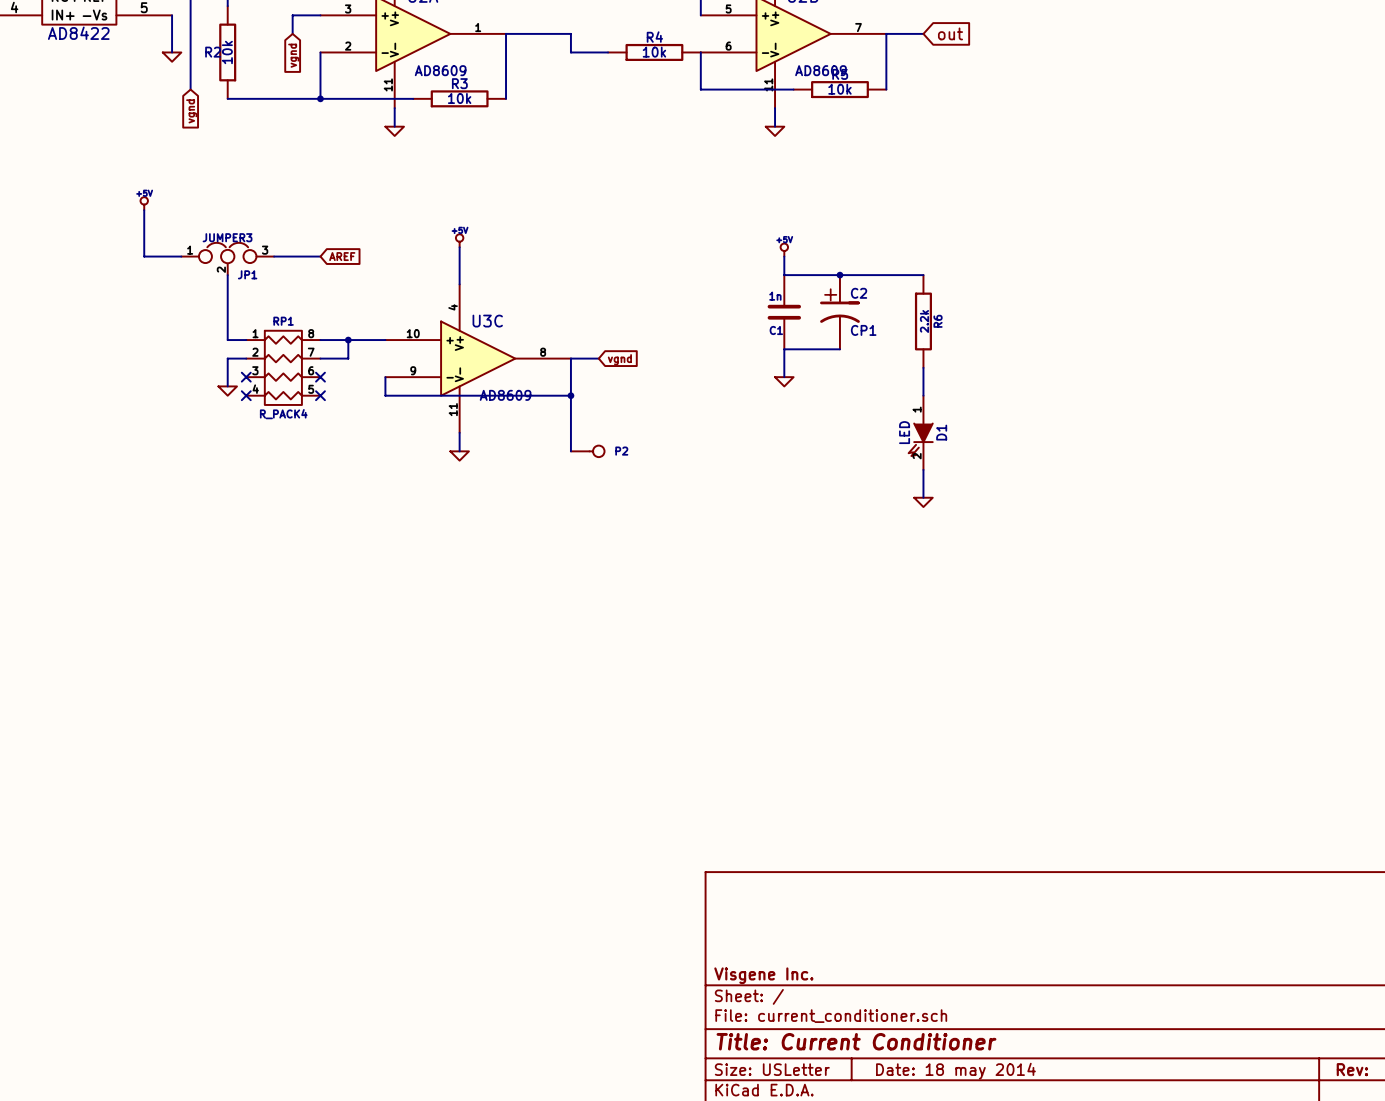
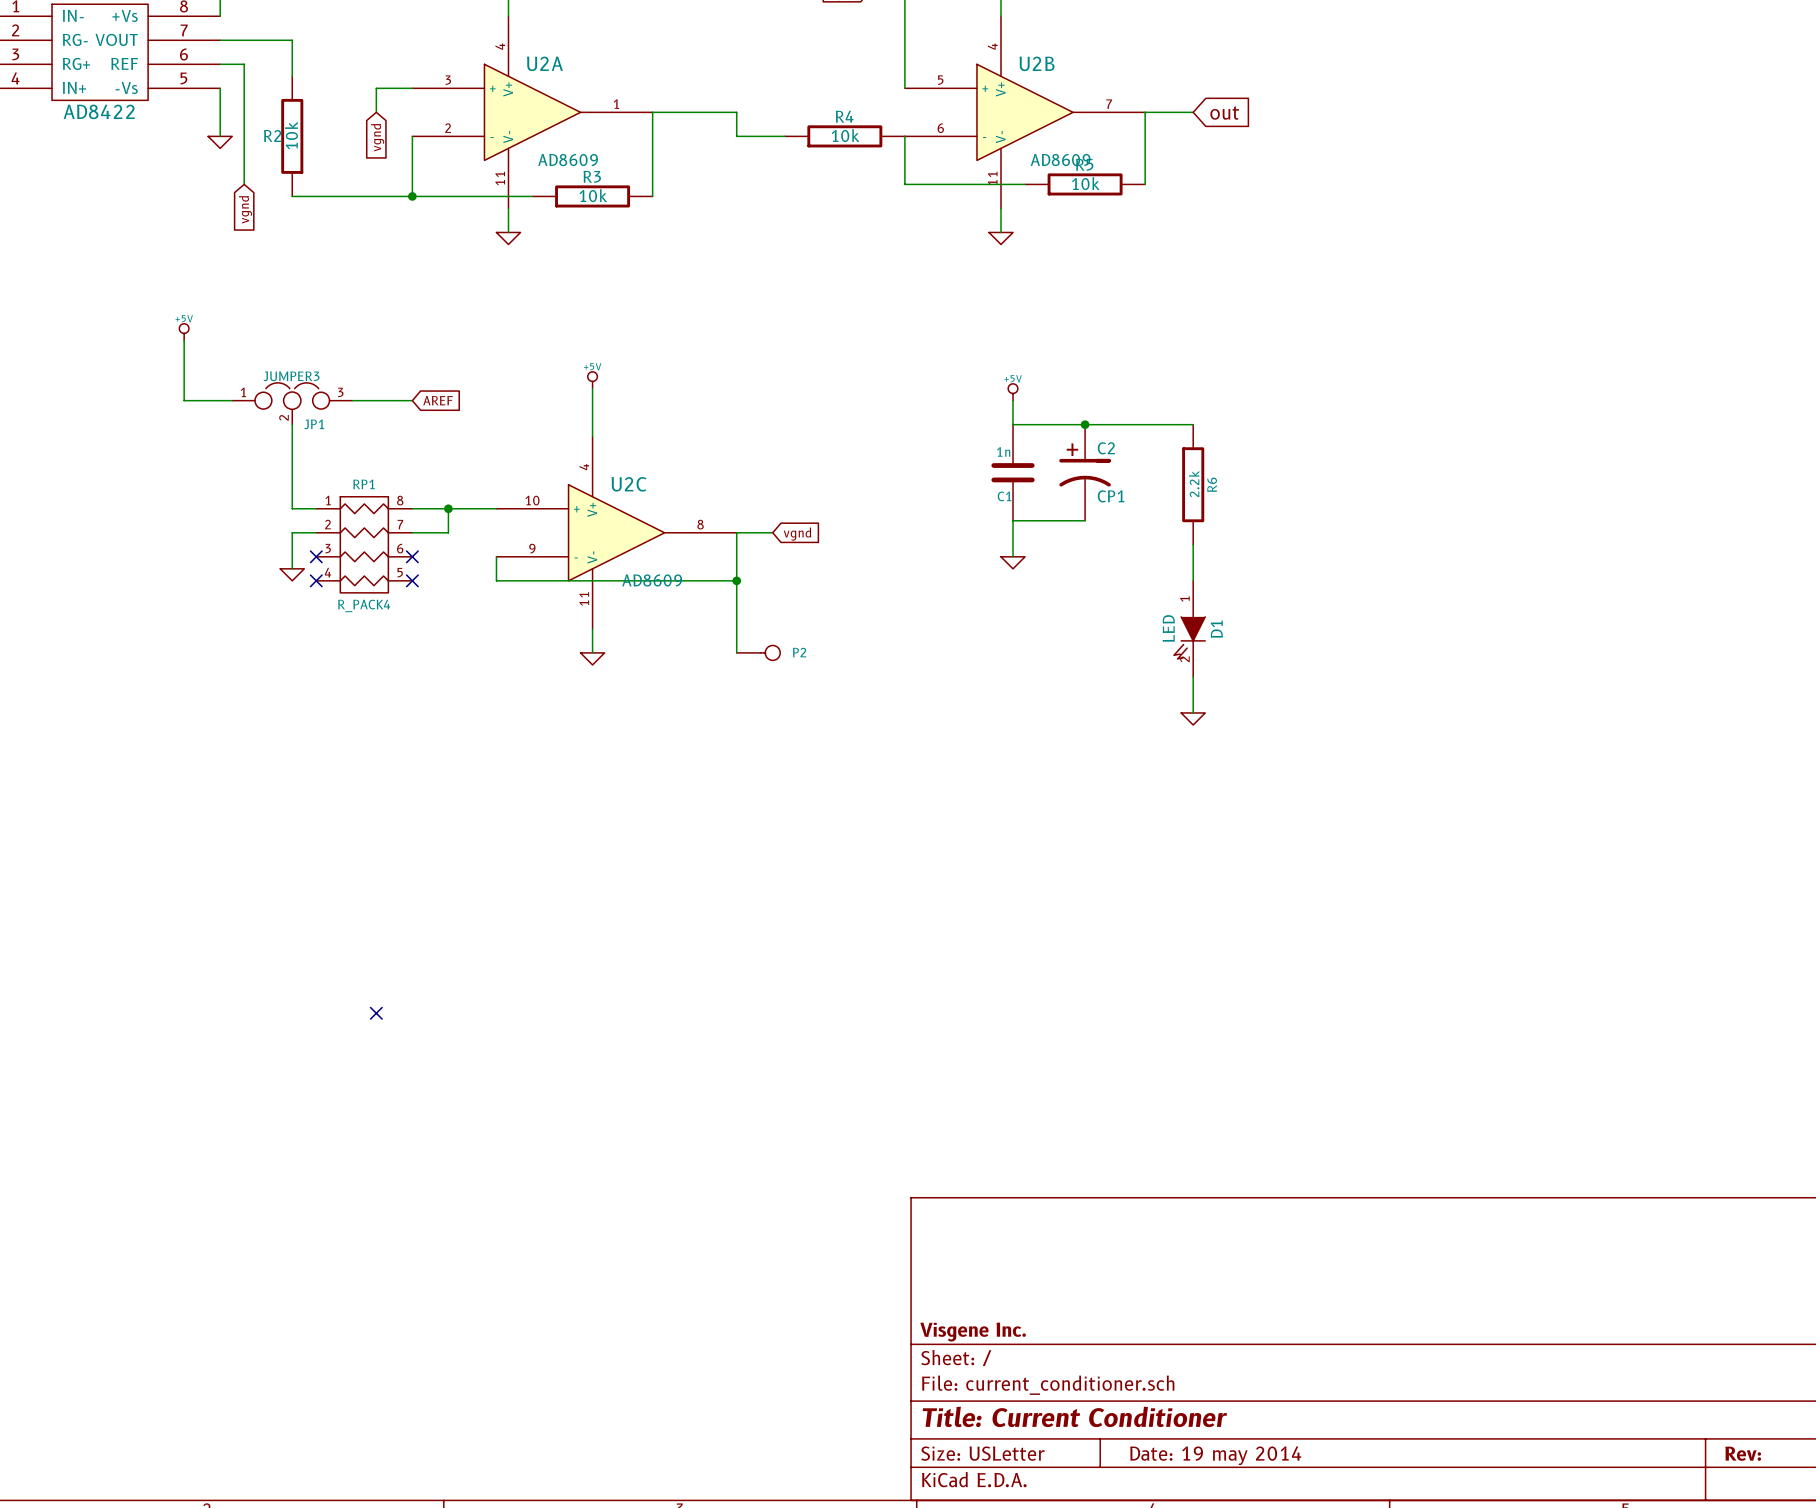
U3C name: U3C (487, 321) -> U2C (628, 484)
no-connect mark: none -> (376, 1013)
title block: Date: 18 may 2014 (955, 1071) -> Date: 19 may 2014 (1215, 1455)

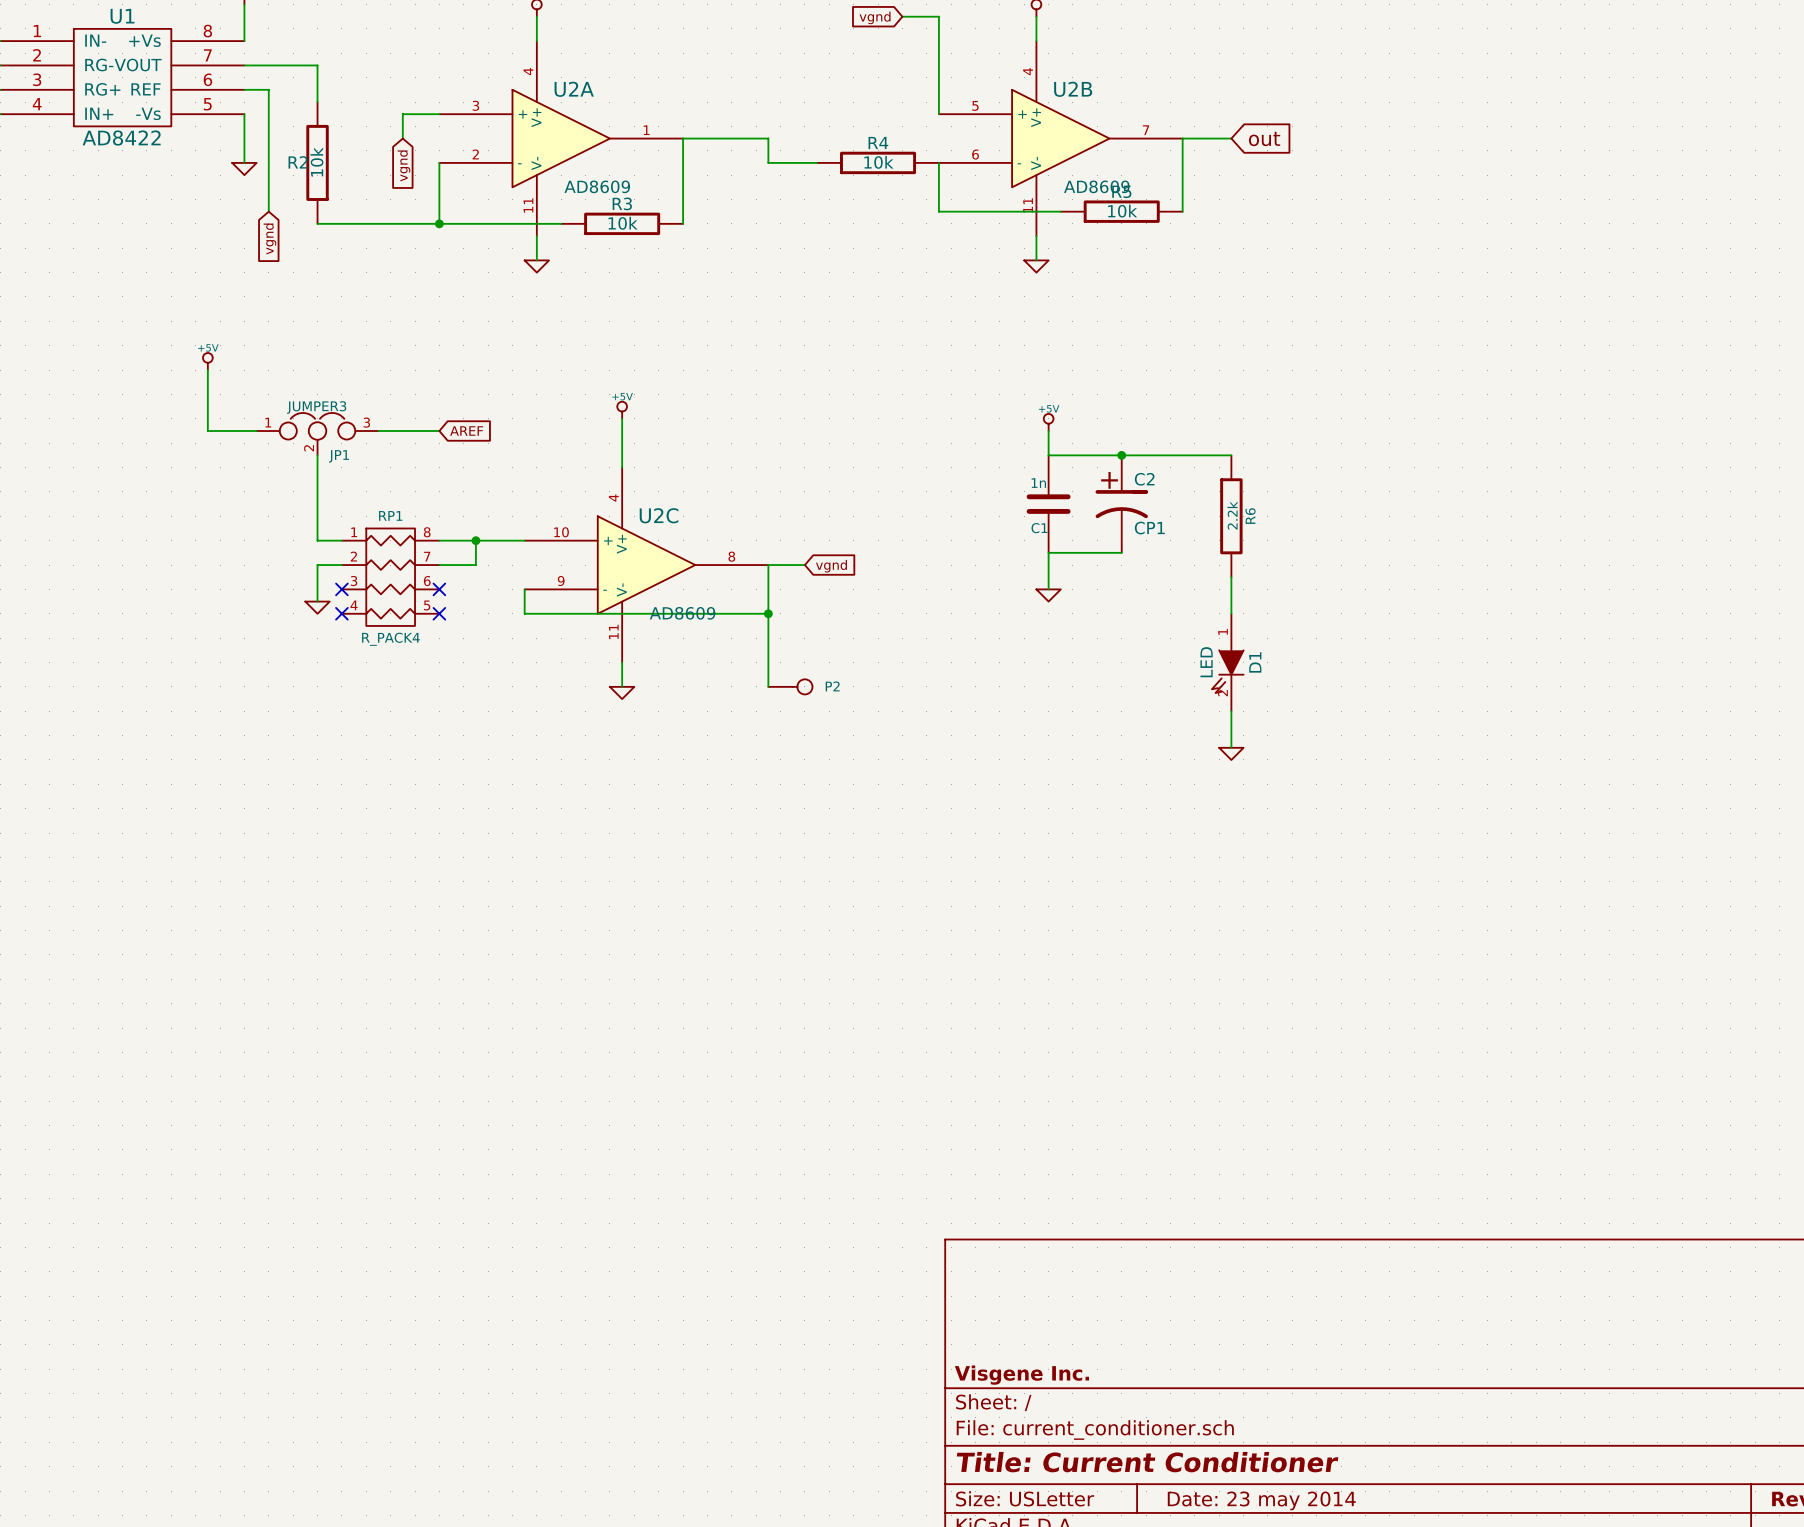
no-connect mark: (376, 1013) -> none
title block: Date: 19 may 2014 (1215, 1455) -> Date: 23 may 2014 (1261, 1500)

